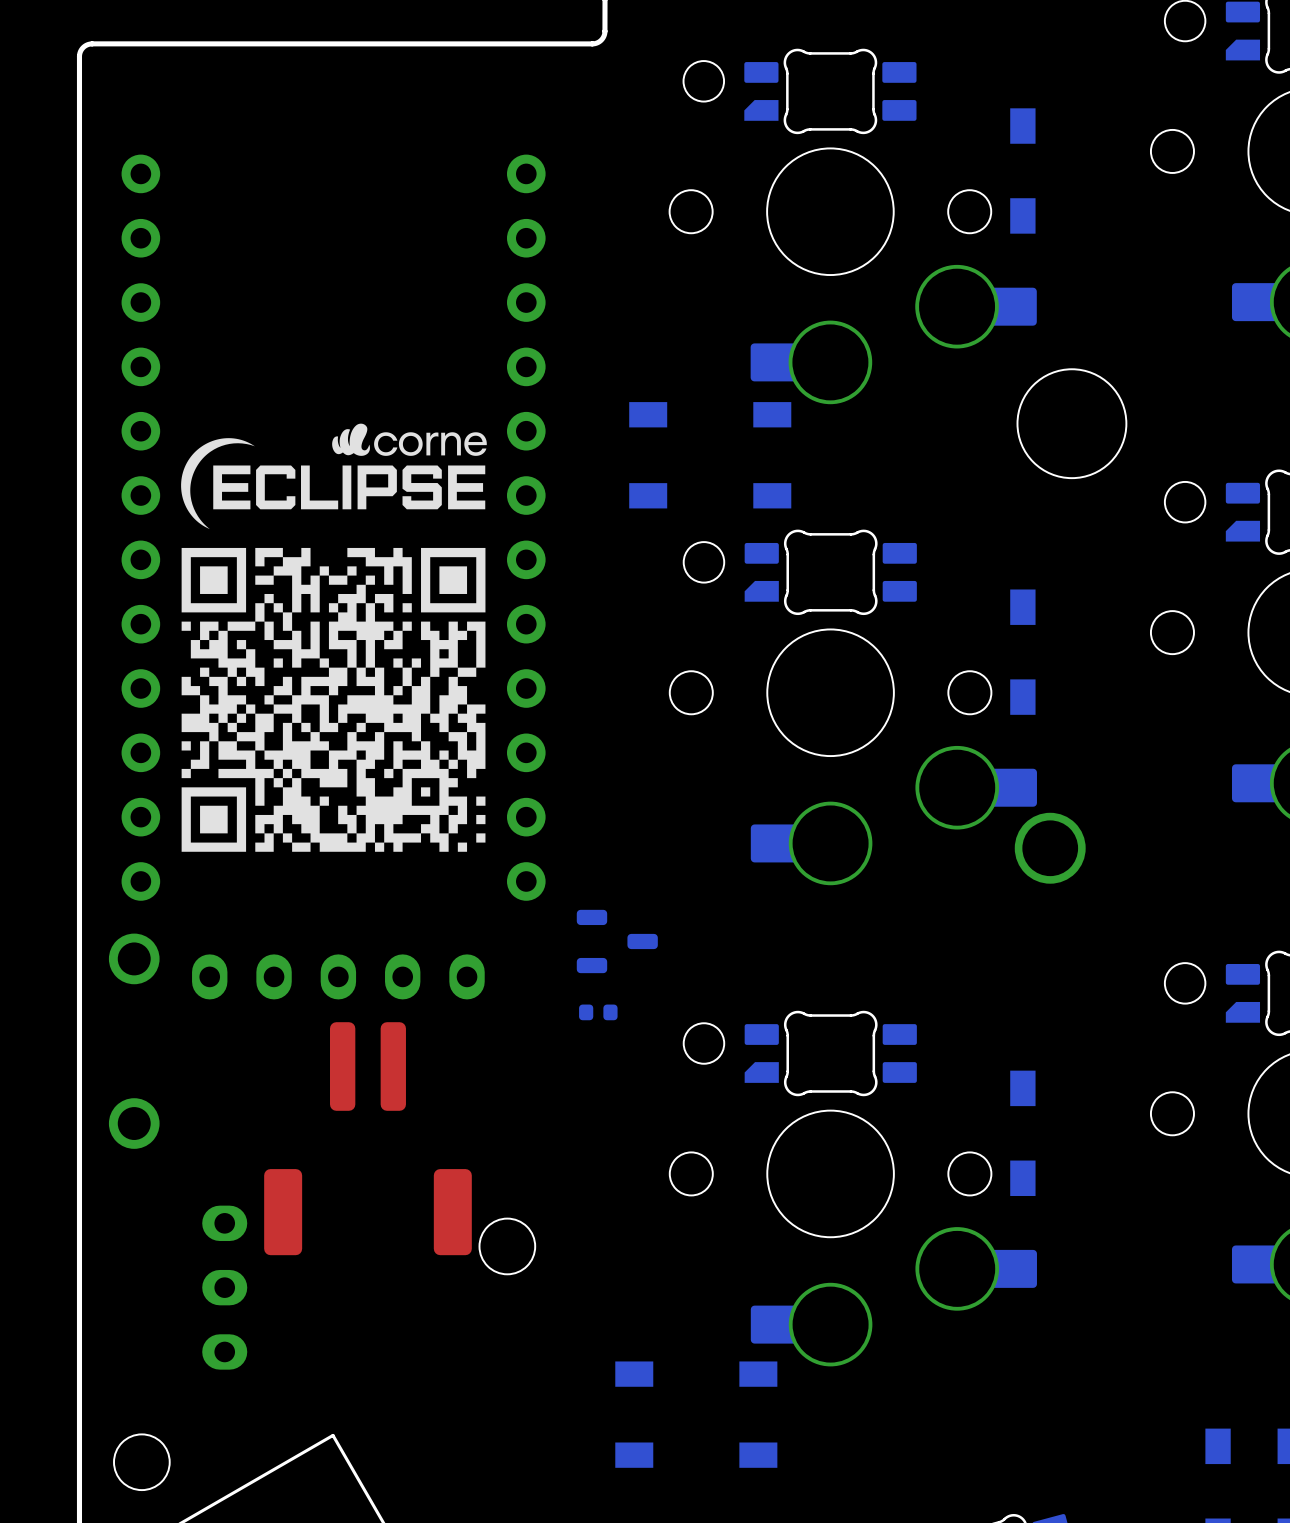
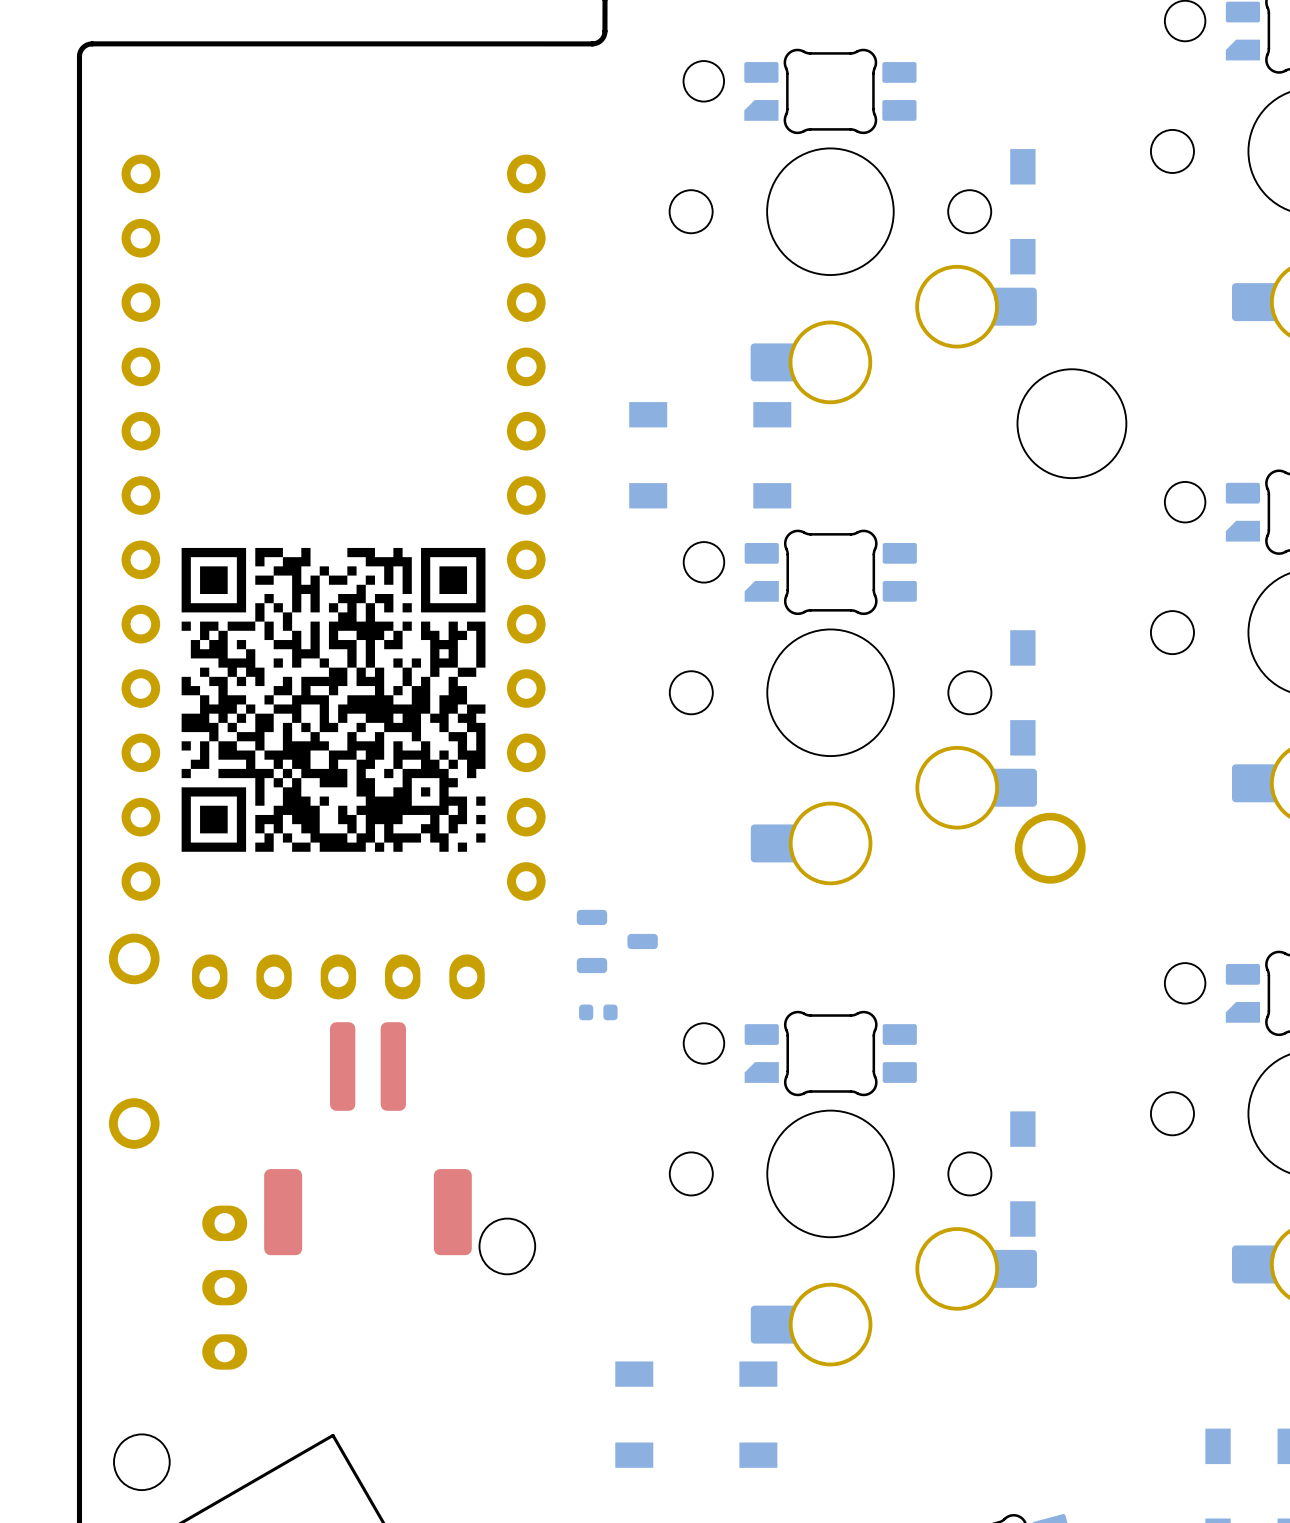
part position: (1022, 170) -> (1022, 211)
drawing: [181, 423, 487, 530] -> none
part position: (1022, 652) -> (1022, 692)
part position: (1022, 1133) -> (1022, 1174)

